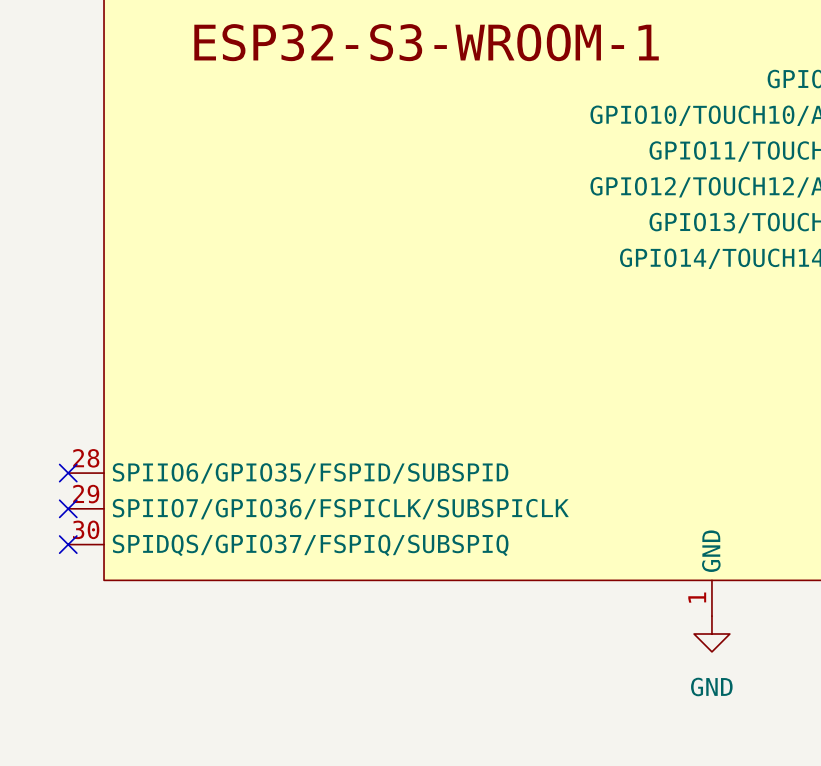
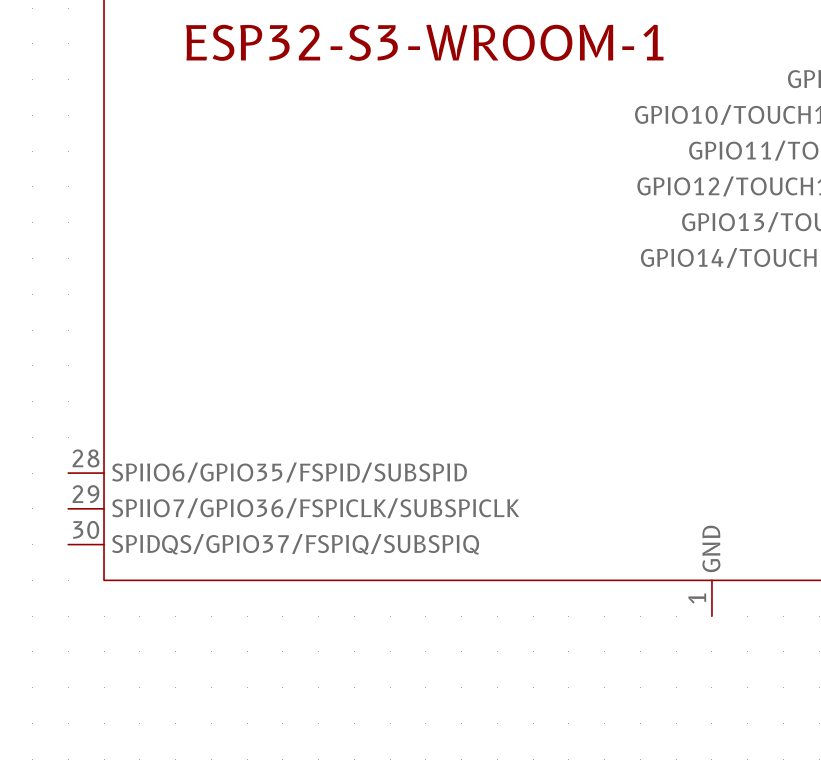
no-connect mark: (68, 473) -> none
no-connect mark: (68, 508) -> none
no-connect mark: (68, 544) -> none
power symbol: GND (711, 634) -> none

